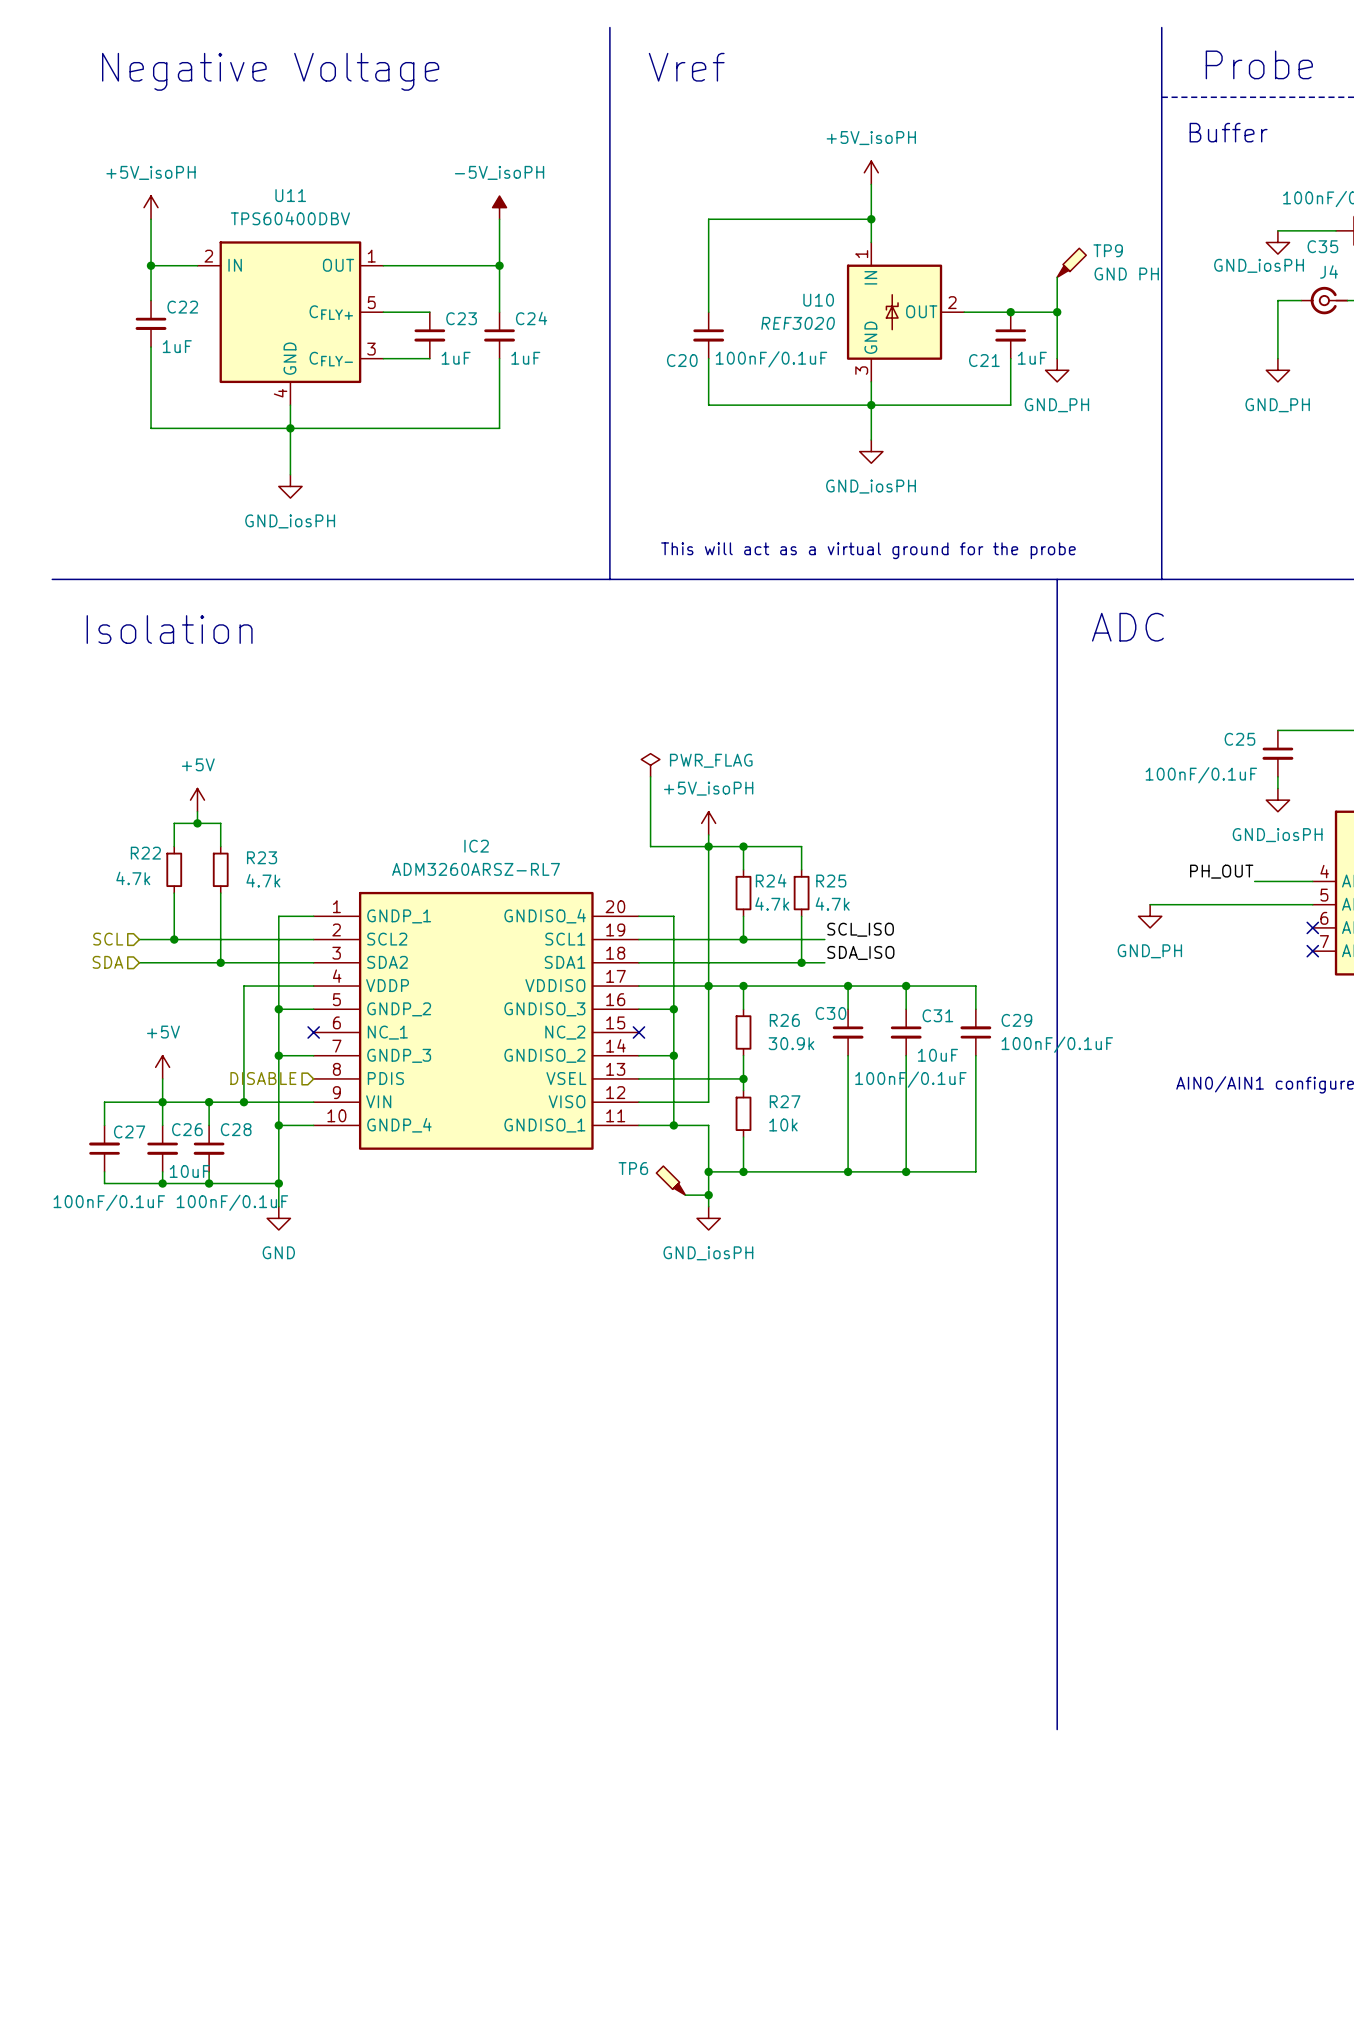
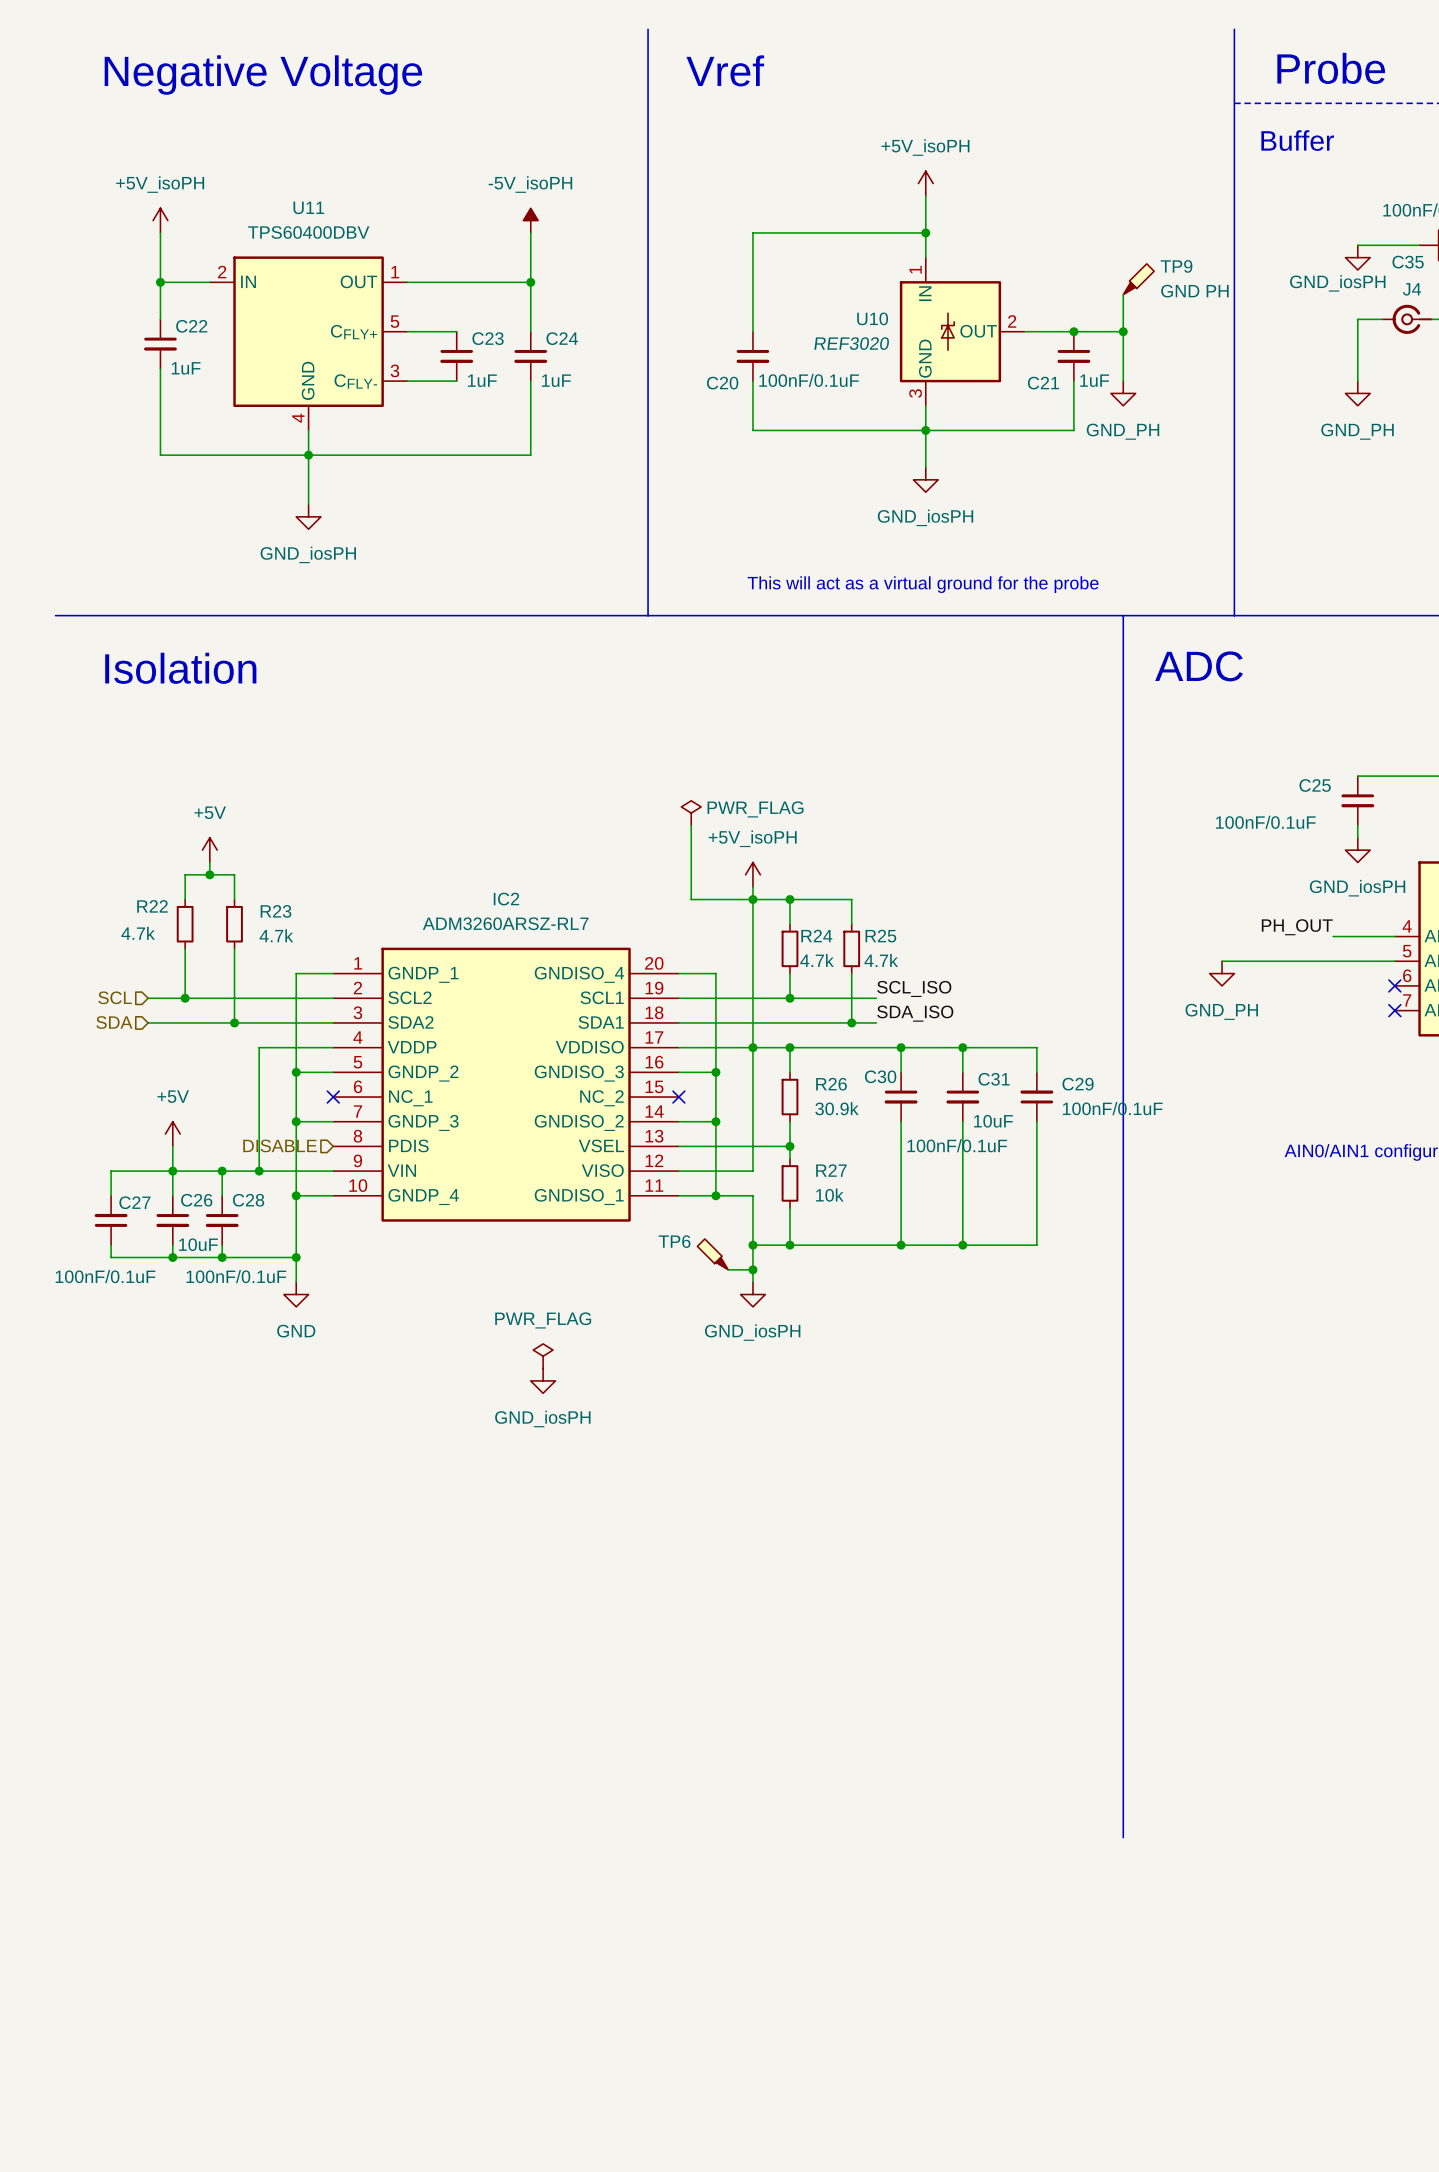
power symbol: none -> PWR_FLAG (543, 1356)
power symbol: none -> GND_iosPH (543, 1380)

